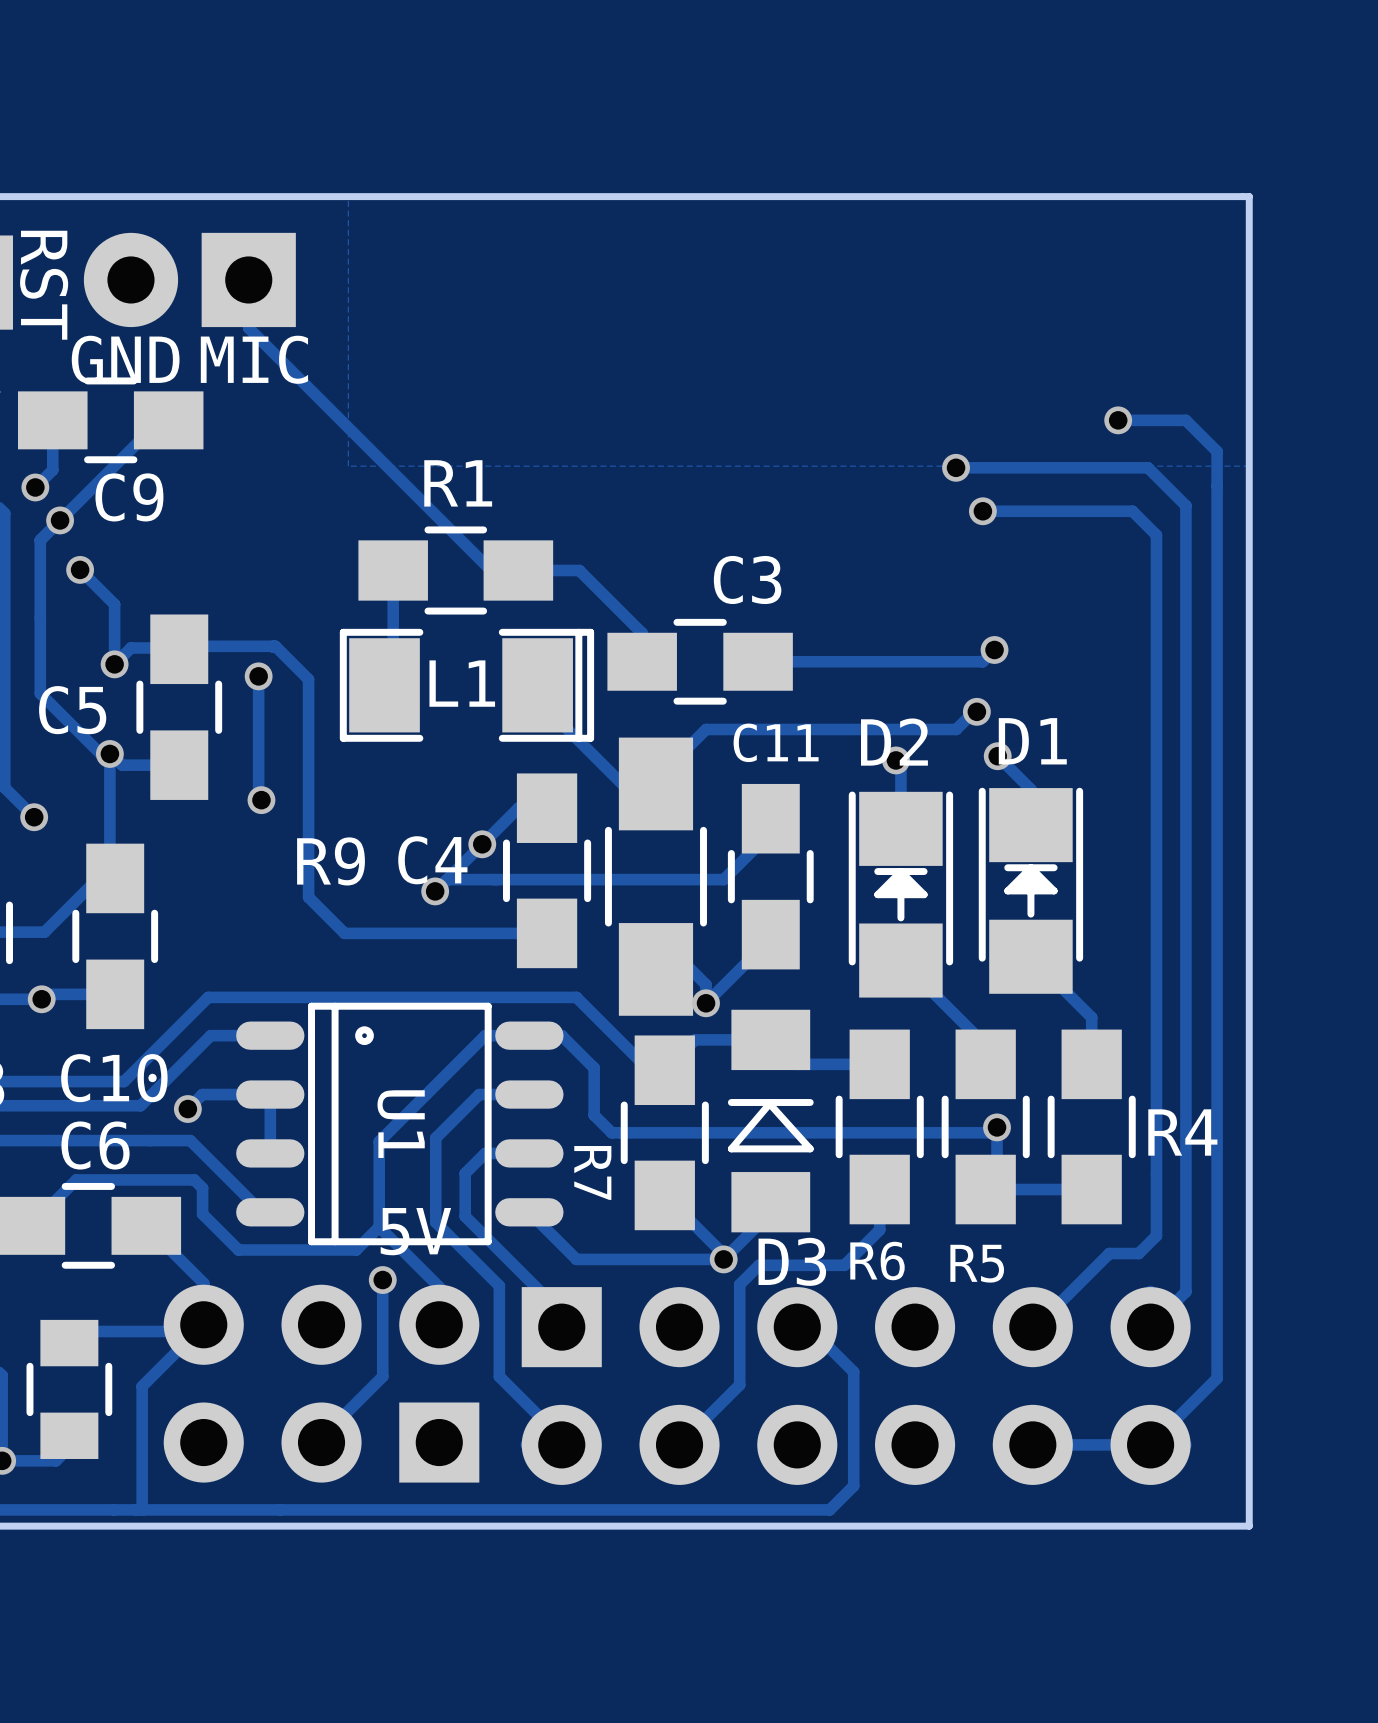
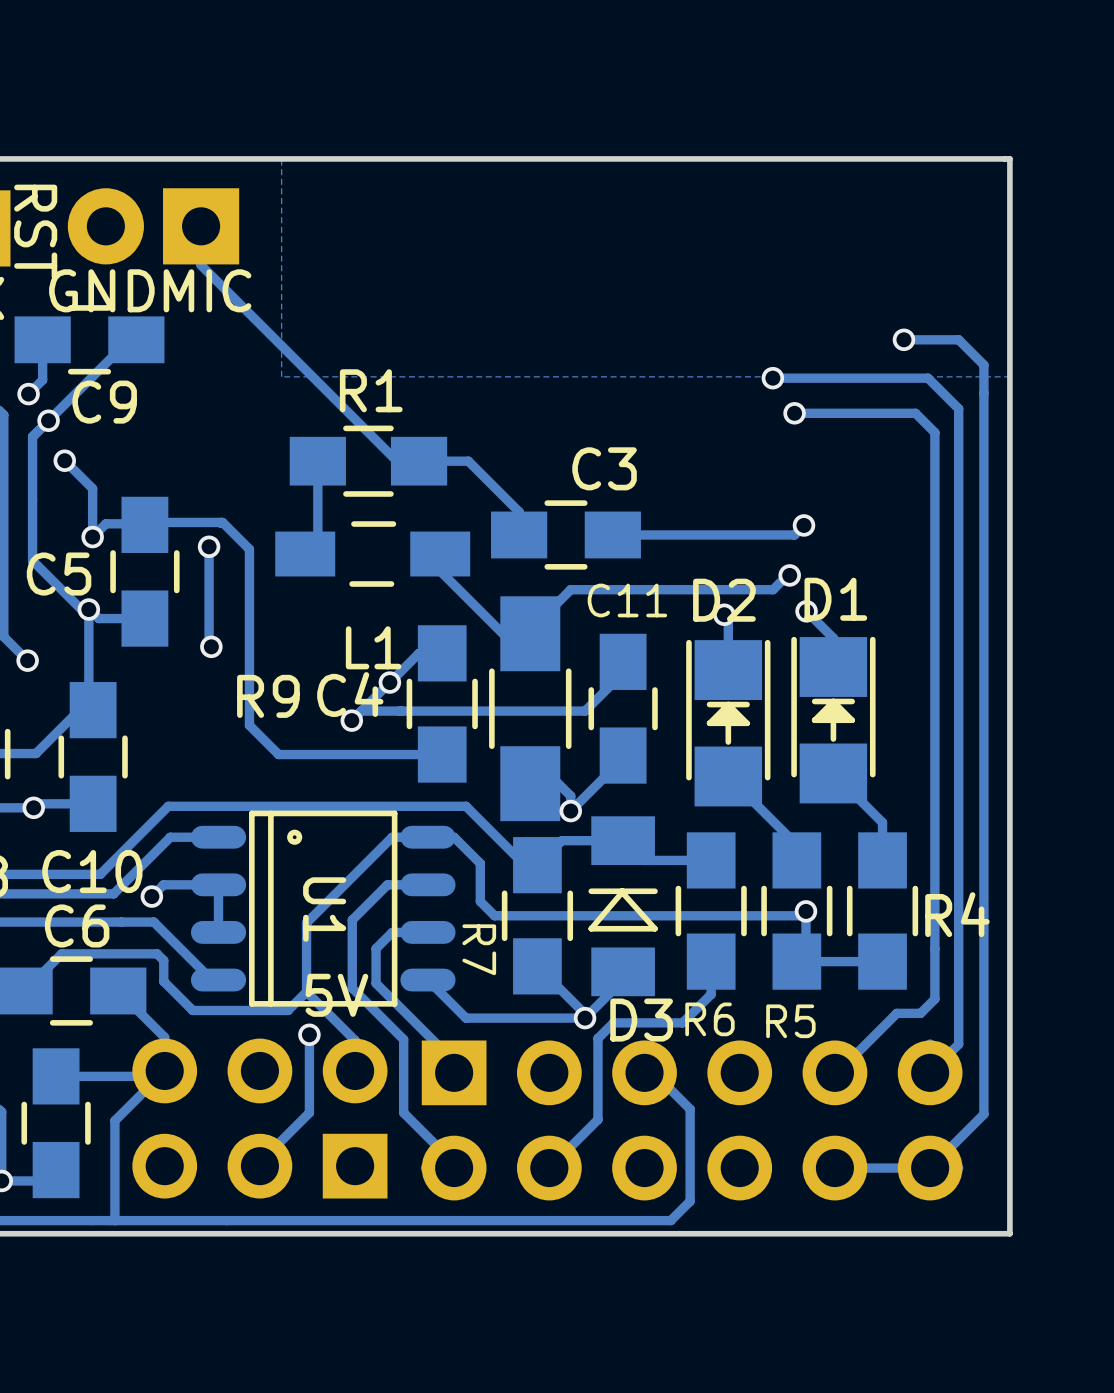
L1 footprint: [339, 628, 595, 742] -> [275, 521, 471, 587]
L1 name position: L1 (462, 683) -> L1 (373, 647)
part footprint: [26, 1319, 113, 1459] -> [21, 1048, 91, 1199]

